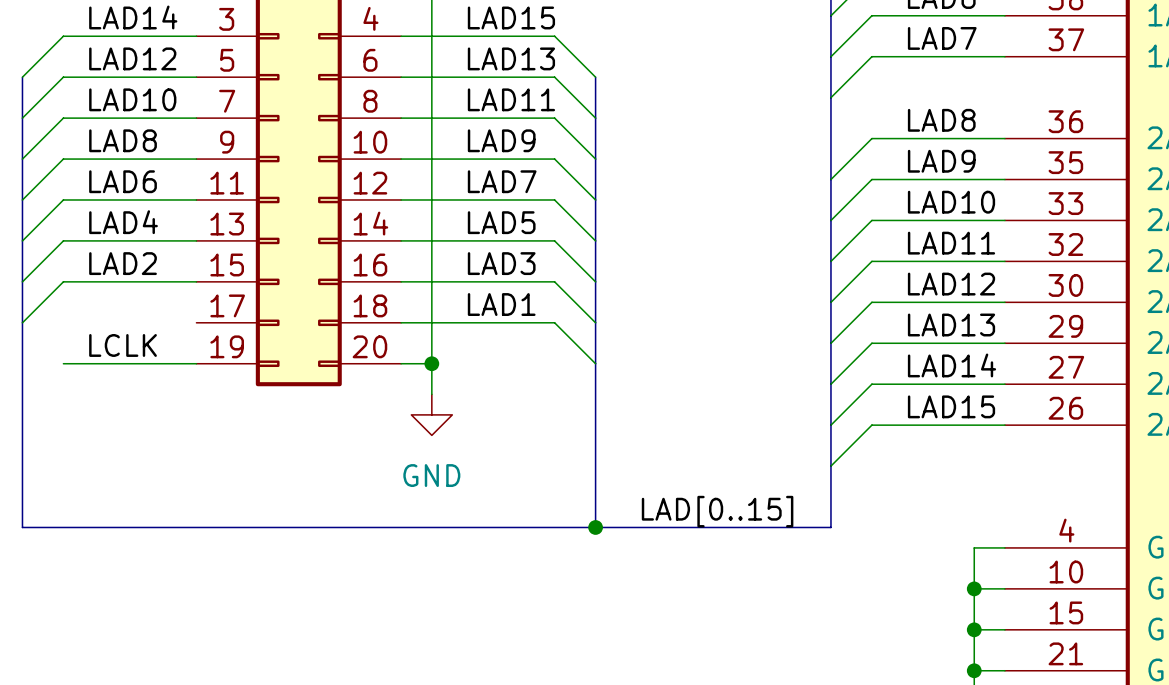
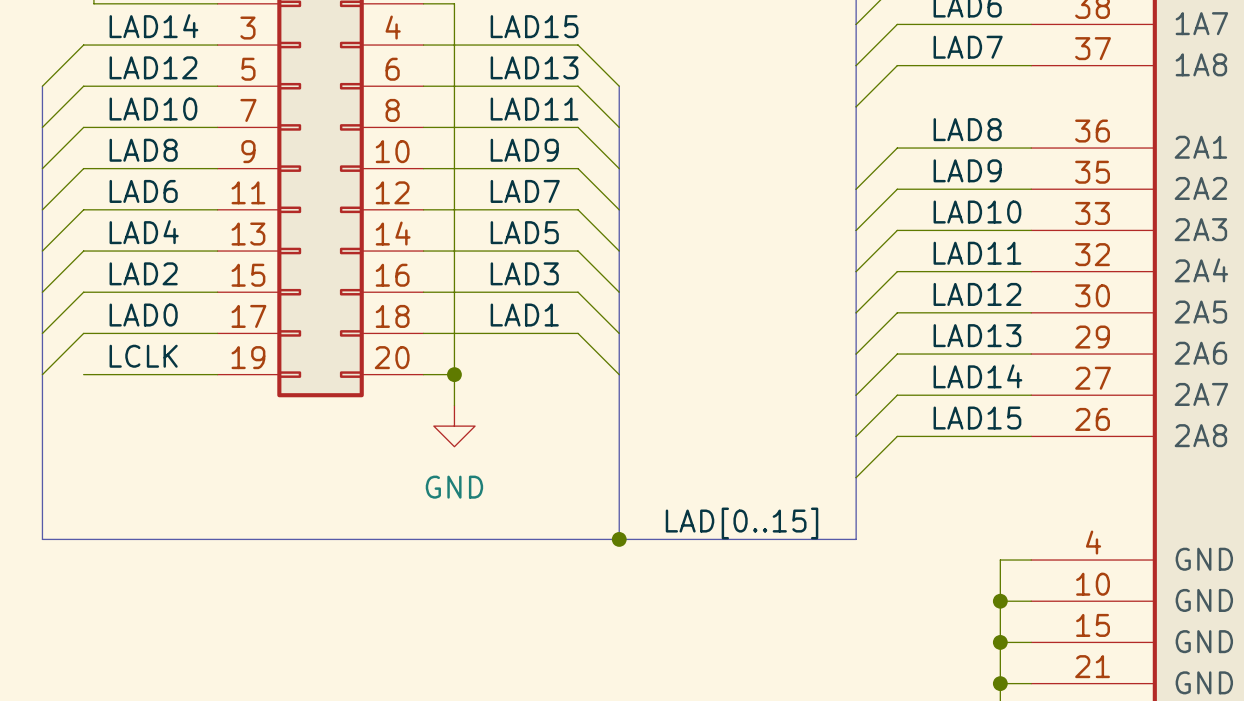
label: none -> LAD0 (143, 315)
wire: none -> (217, 333) (83, 333) (42, 374)

